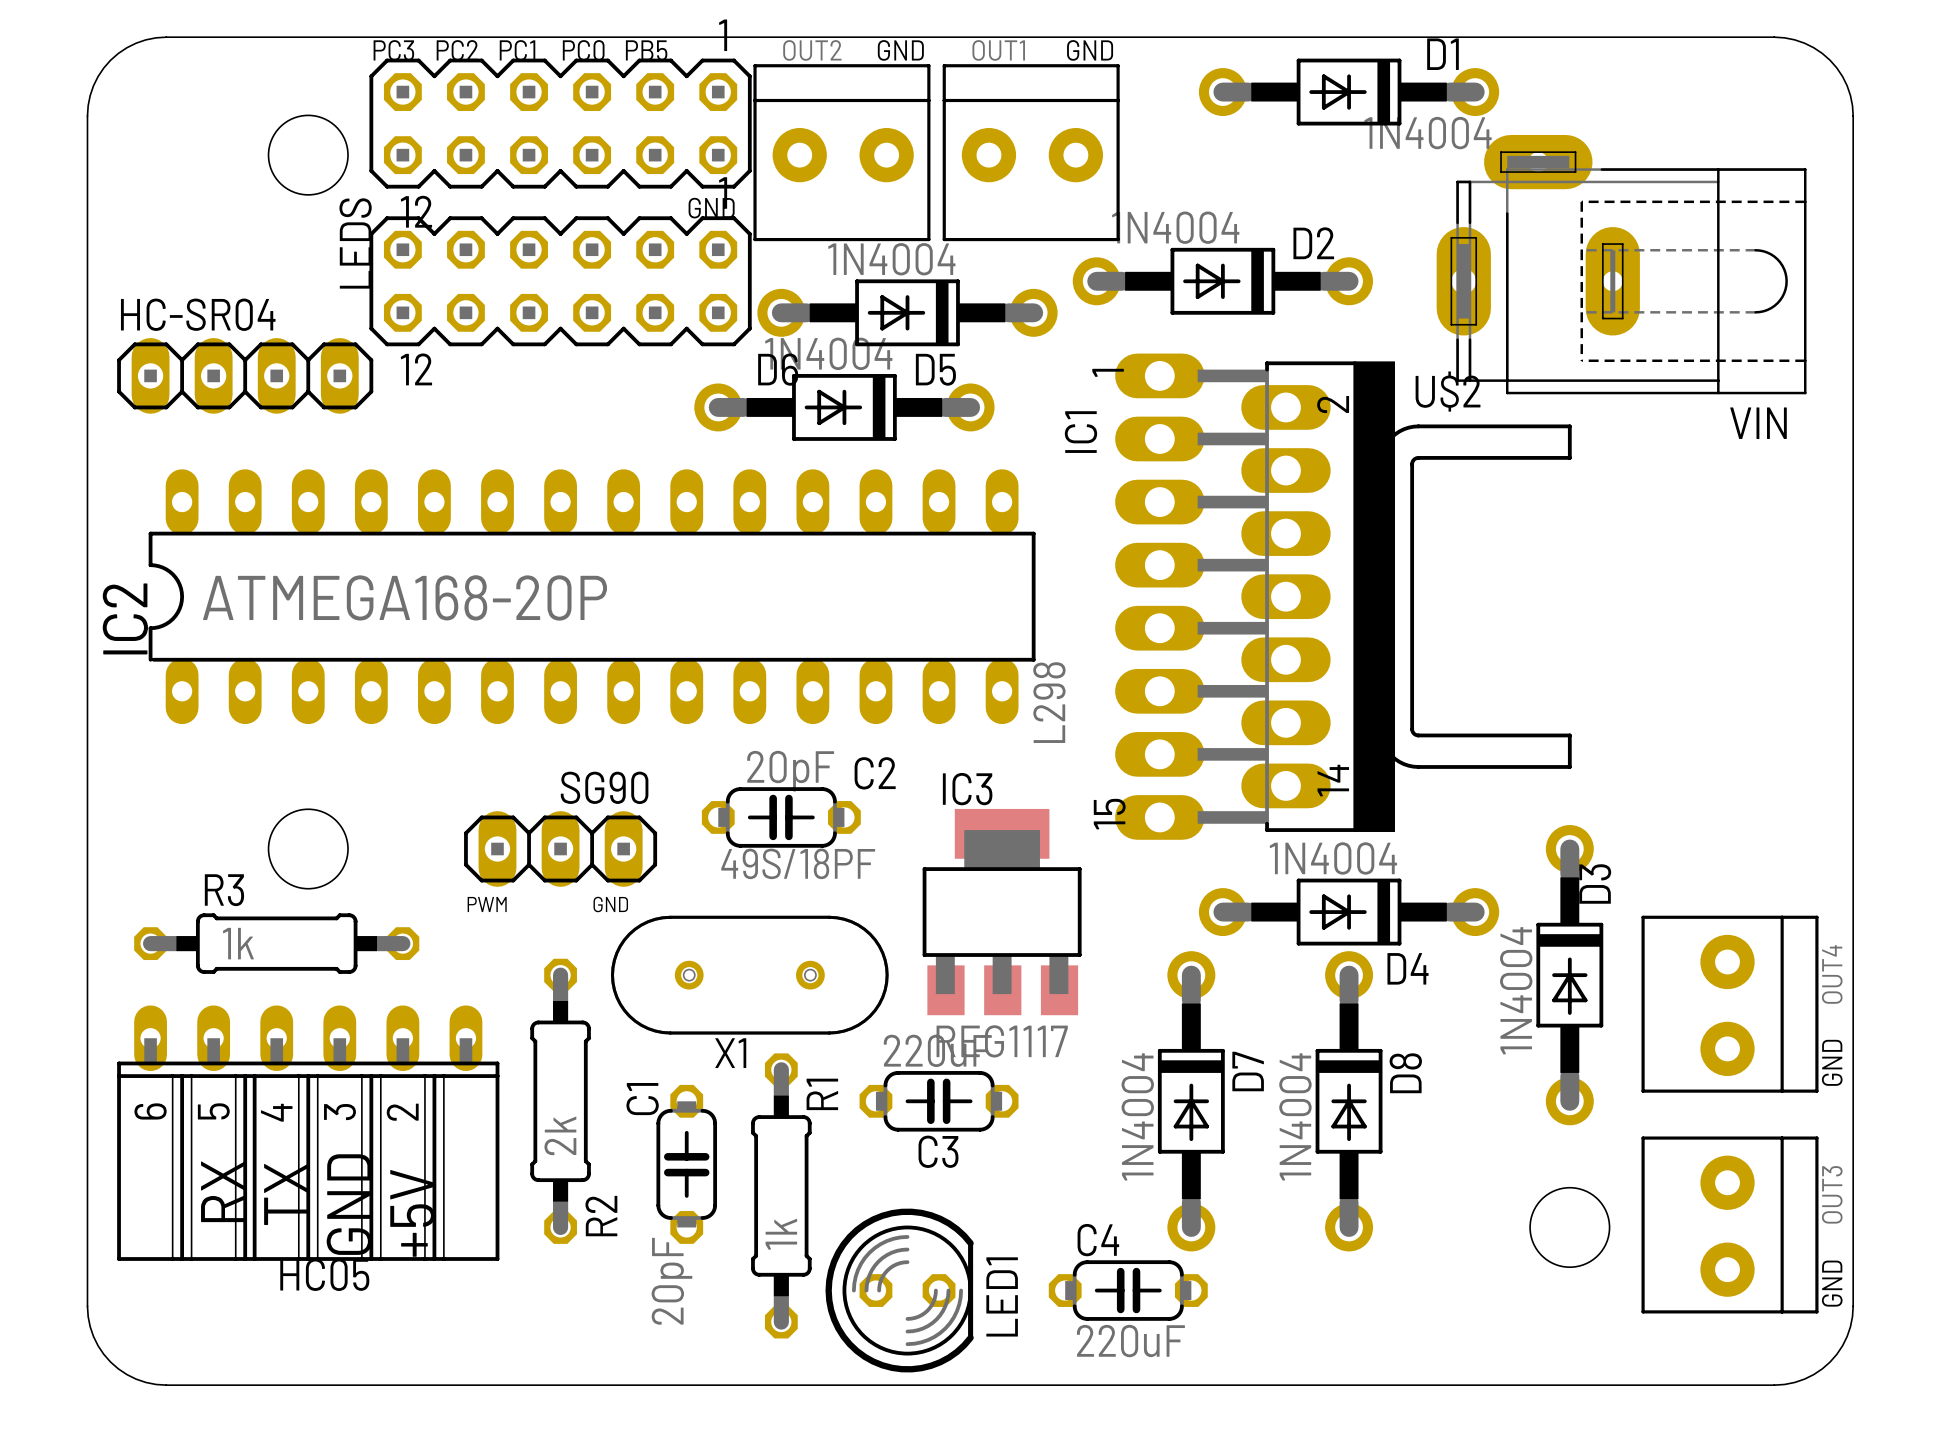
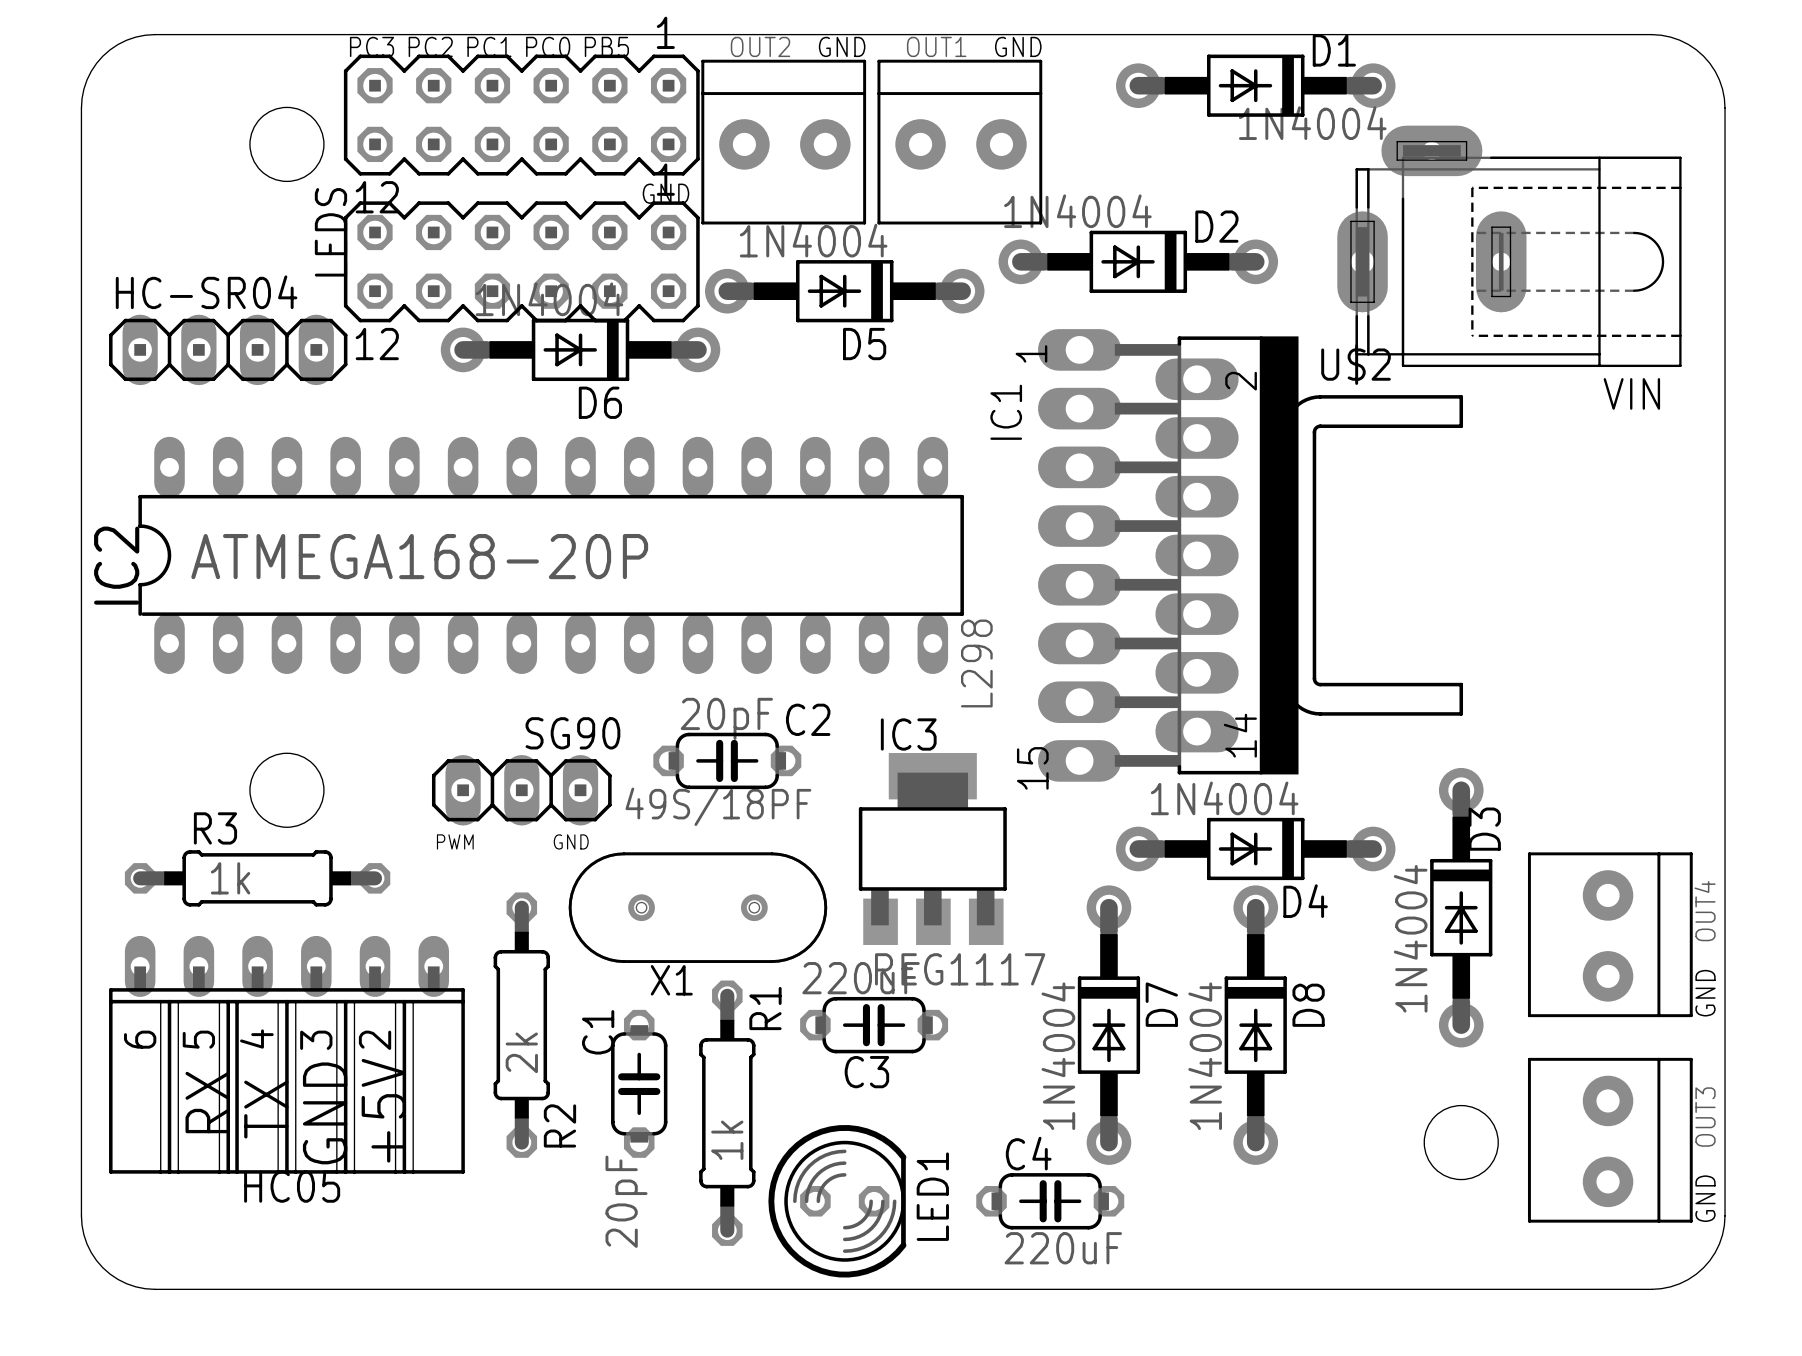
D6 name position: D6 (778, 369) -> D6 (600, 402)
D6 position: (844, 407) -> (580, 349)

